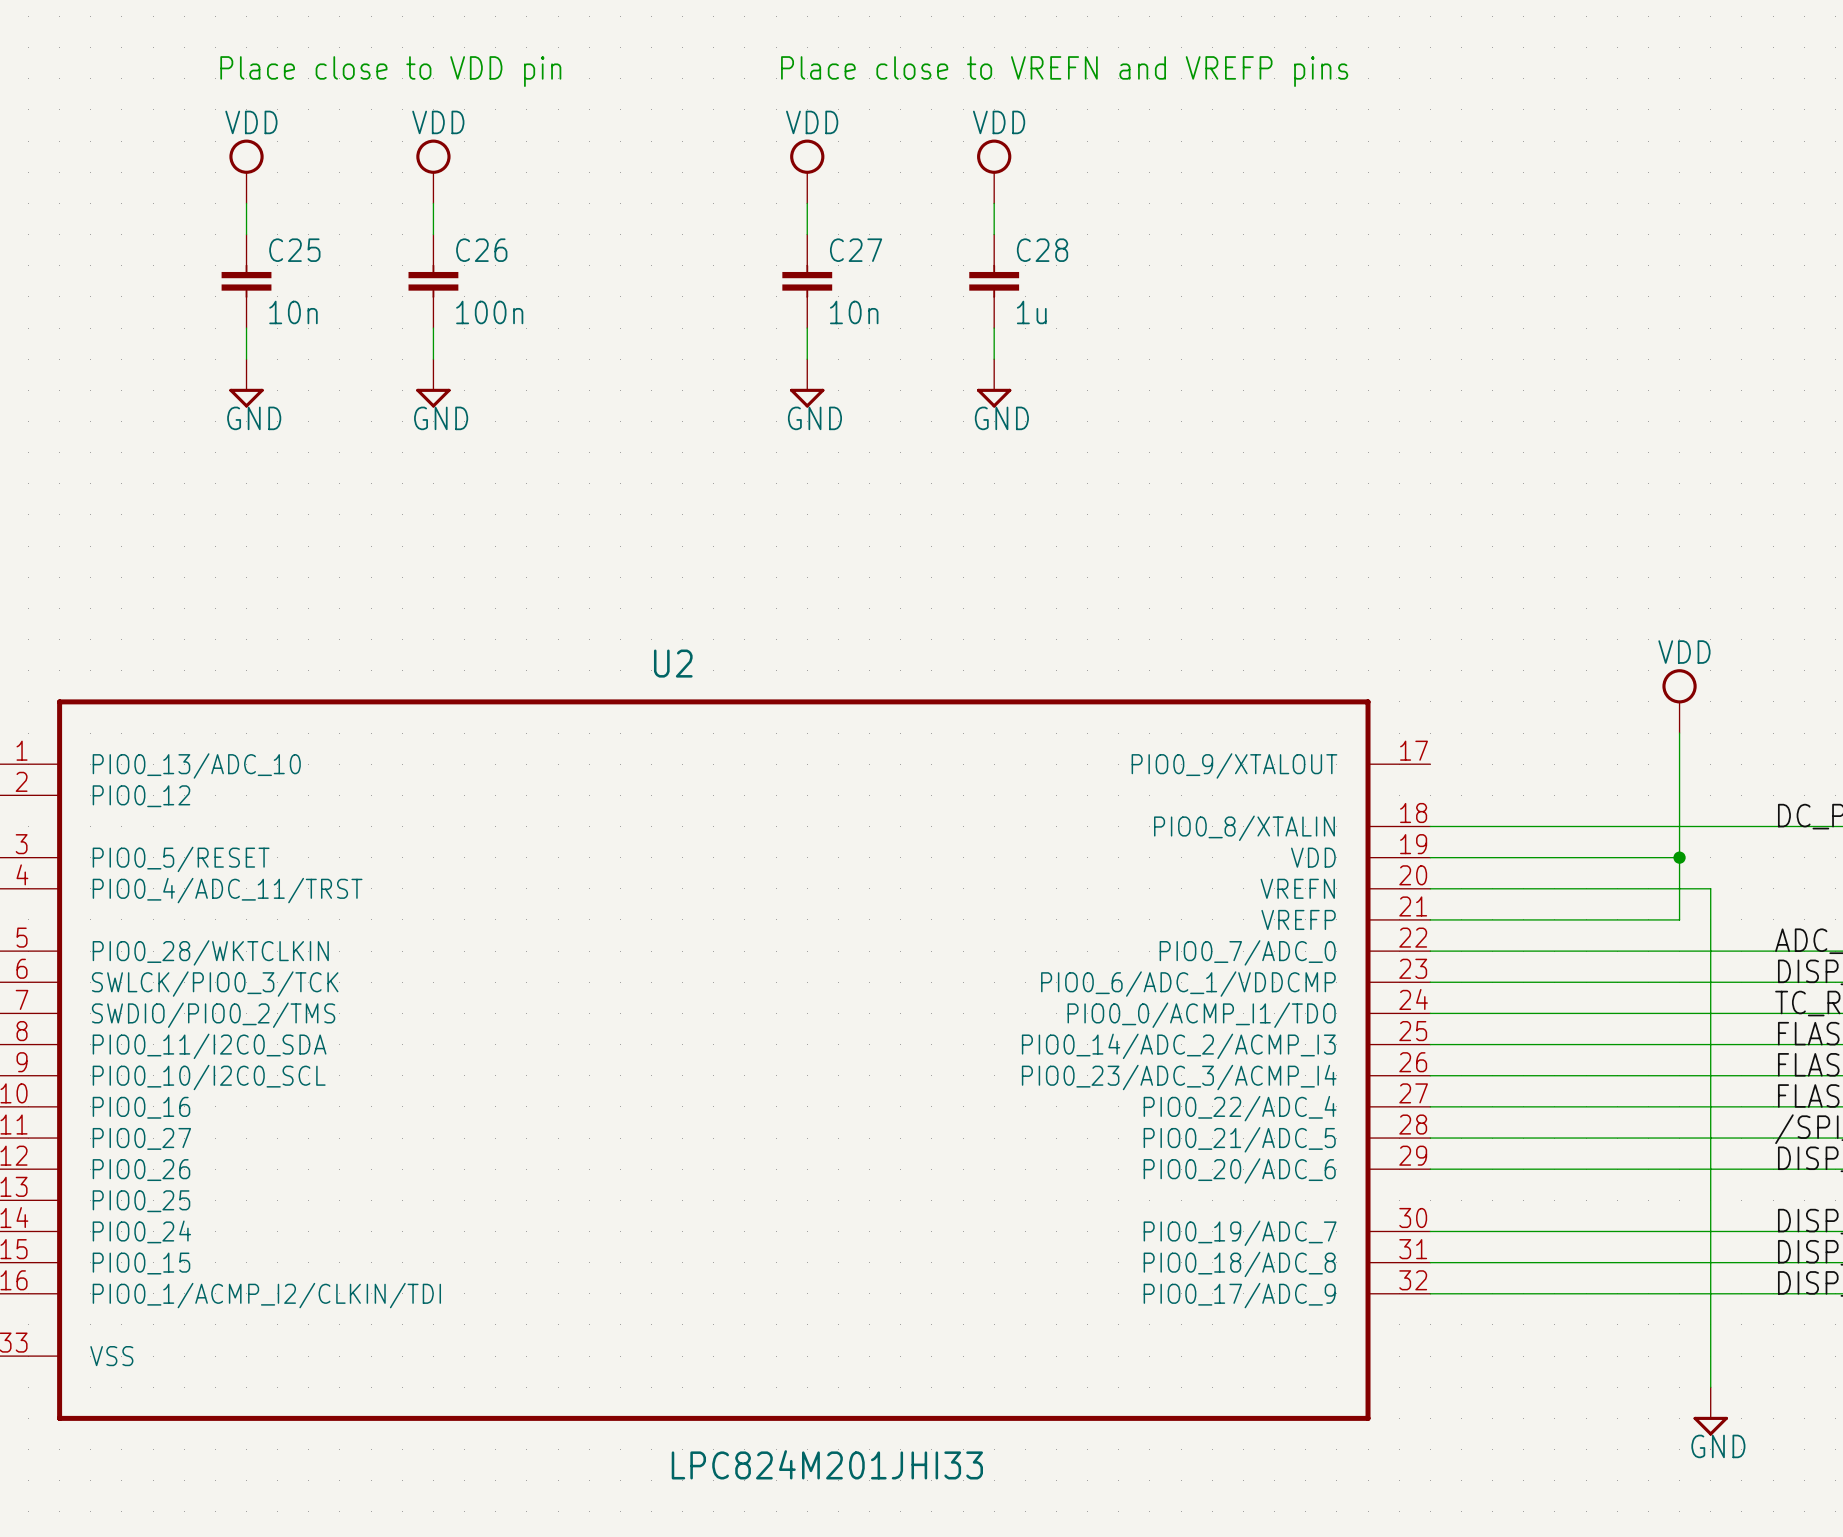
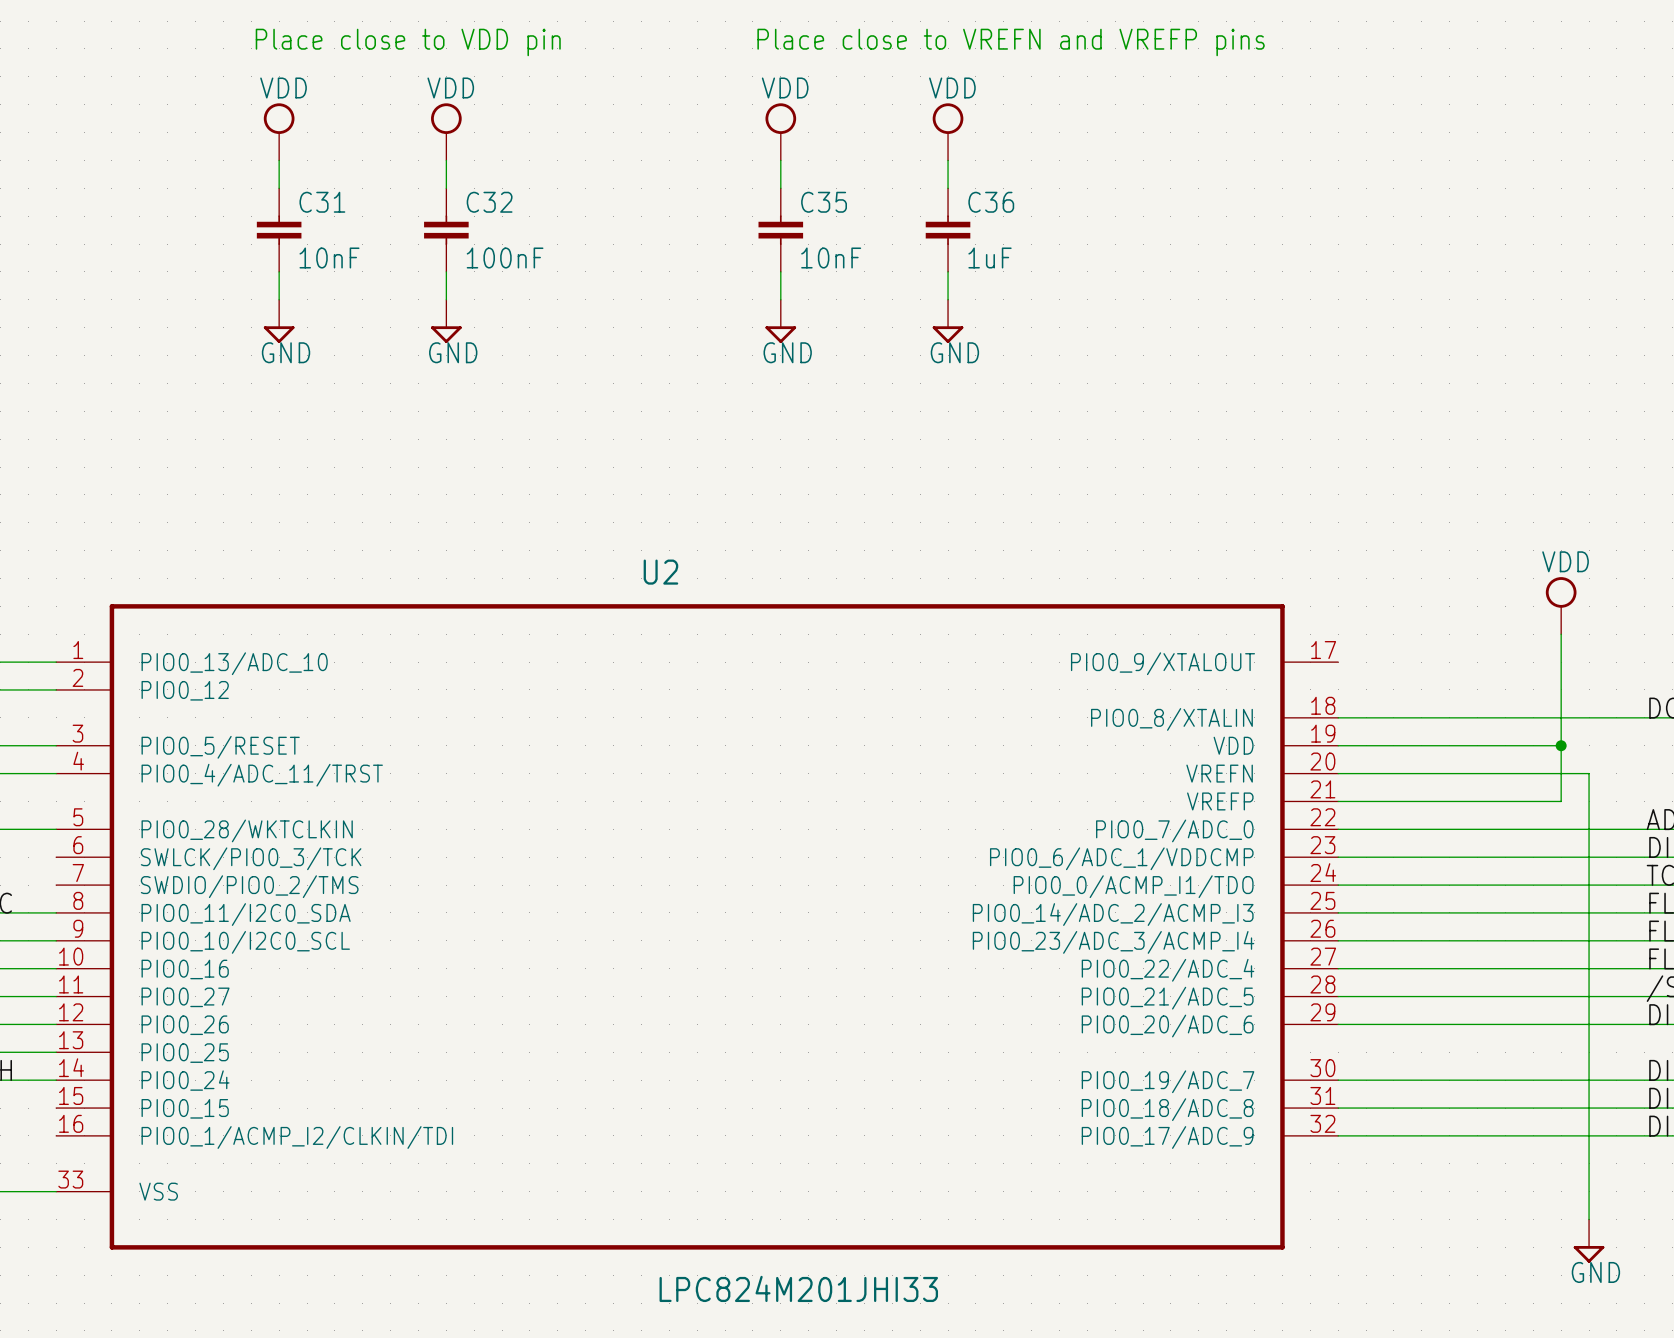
C25 name: C25 (294, 250) -> C31 (322, 202)
C26 name: C26 (481, 250) -> C32 (489, 202)
C27 name: C27 (856, 250) -> C35 (824, 202)
C28 name: C28 (1042, 250) -> C36 (991, 202)
C25 value: 10n (293, 312) -> 10nF (329, 258)
C26 value: 100n (489, 312) -> 100nF (505, 258)
C27 value: 10n (854, 312) -> 10nF (831, 258)
C28 value: 1u (1031, 312) -> 1uF (990, 258)

